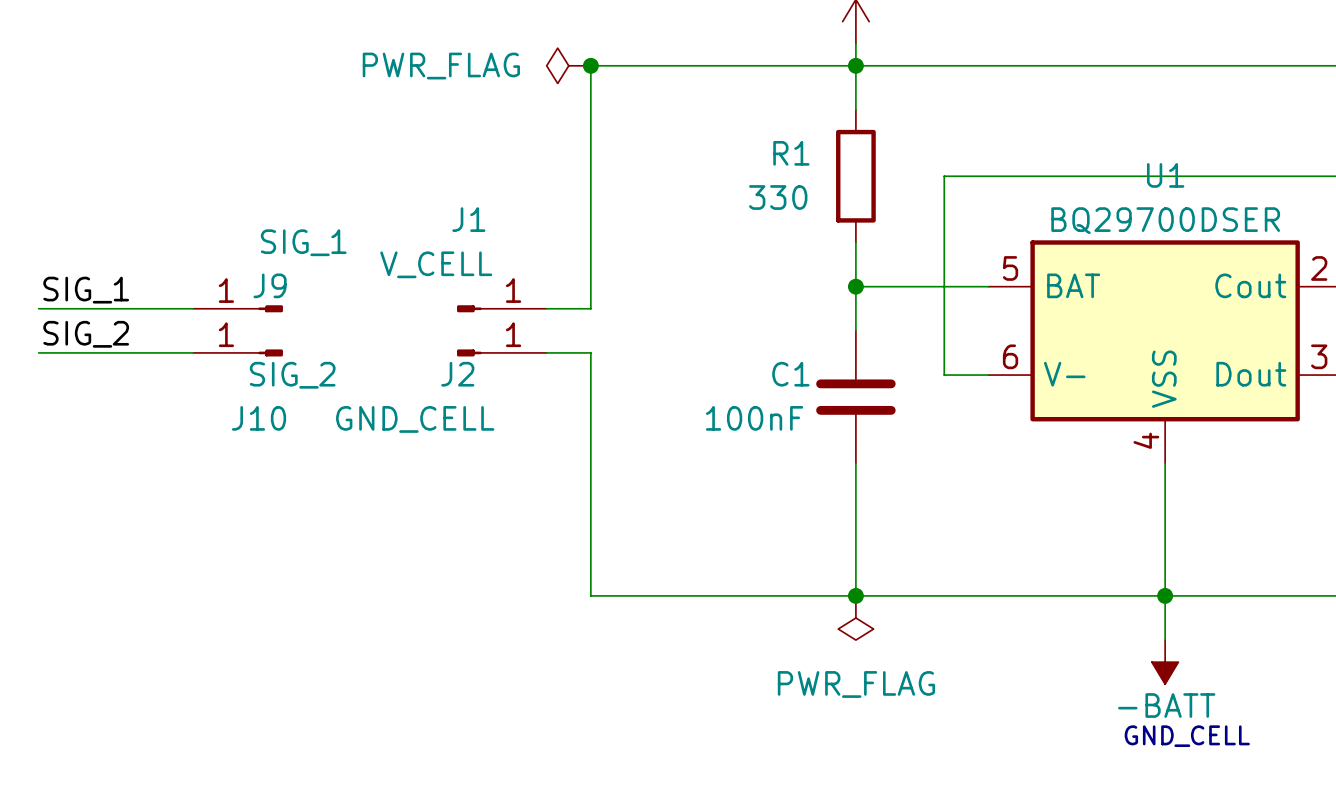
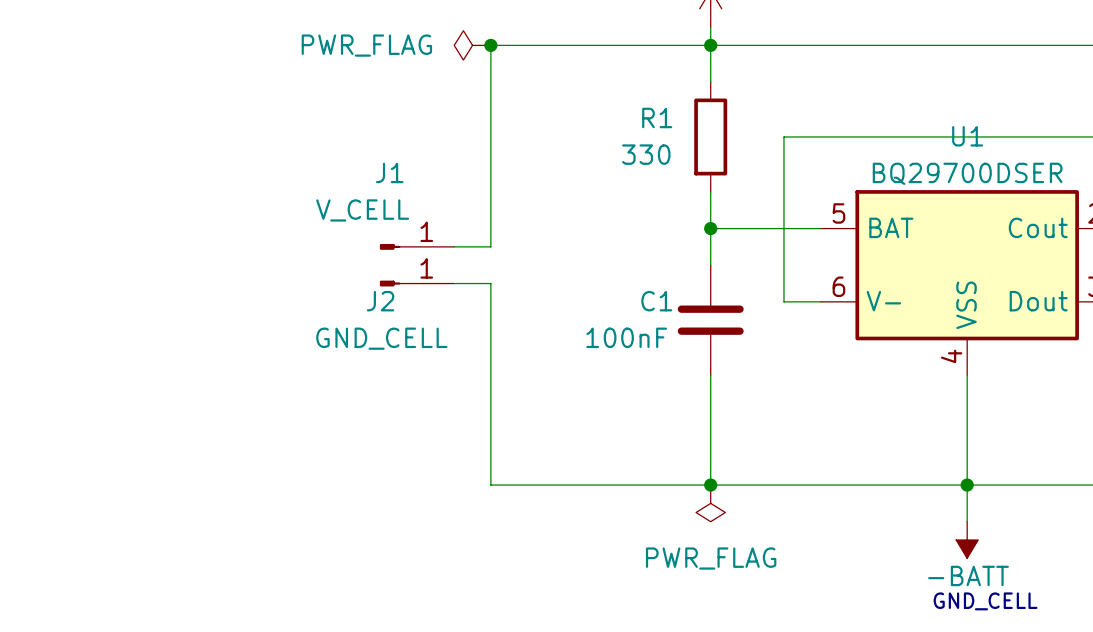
label: SIG_1 (86, 290) -> none
wire: (38, 308) (193, 308) -> none
J9: SIG_1 (238, 308) -> none
label: SIG_2 (86, 334) -> none
wire: (38, 352) (193, 352) -> none
J10: SIG_2 (238, 352) -> none
J2 value position: GND_CELL (415, 419) -> GND_CELL (381, 338)

